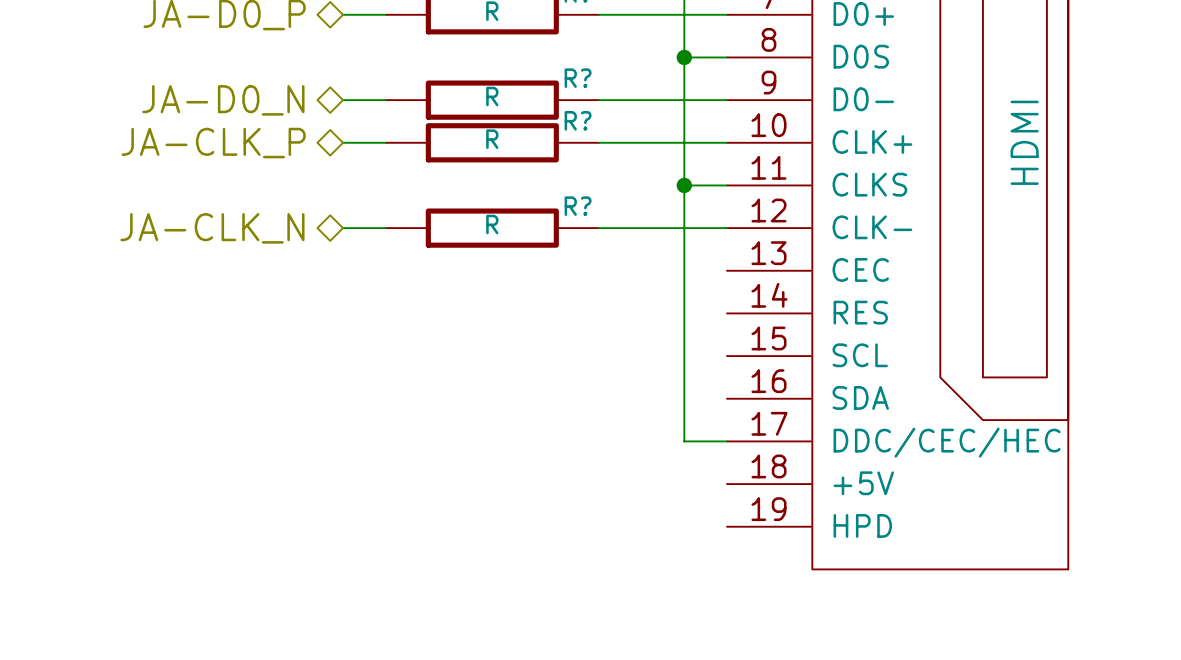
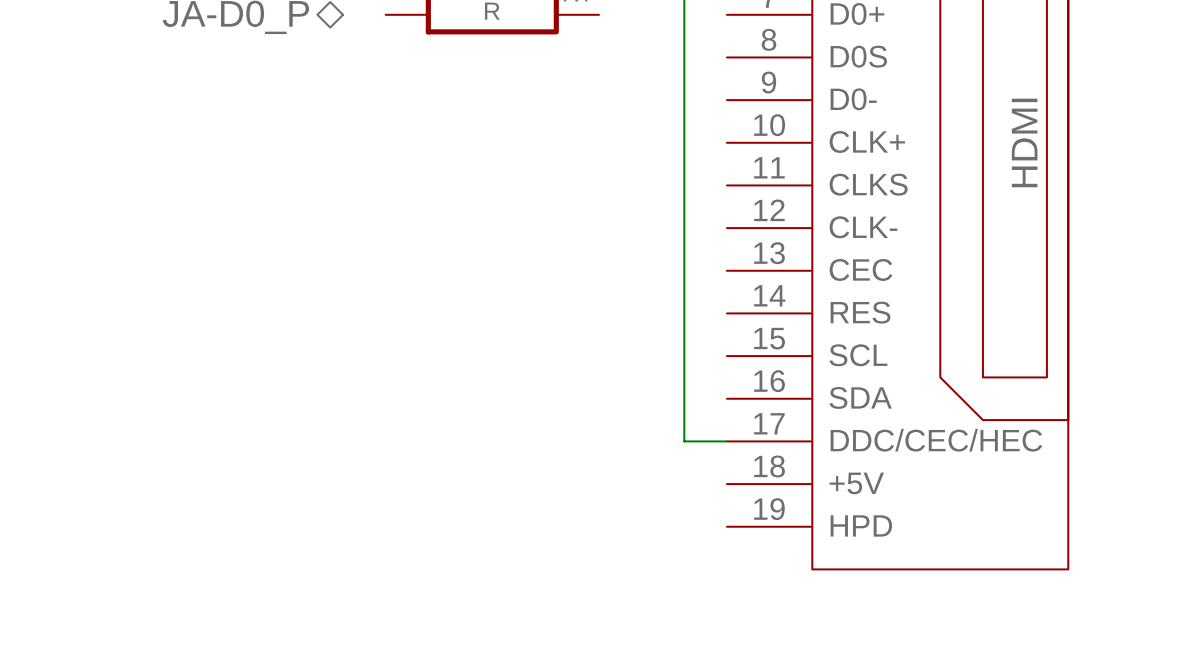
wire: (343, 14) (385, 14) -> none
wire: (598, 14) (726, 14) -> none
wire: (684, 57) (726, 57) -> none
junction: (684, 57) -> none
hierarchical label: JA-D0_N (223, 100) -> none
wire: (343, 100) (385, 100) -> none
R?: R (492, 100) -> none
wire: (598, 100) (726, 100) -> none
wire: (343, 142) (385, 142) -> none
R?: R (492, 142) -> none
wire: (598, 142) (726, 142) -> none
hierarchical label: JA-CLK_P (213, 143) -> none
wire: (684, 185) (726, 185) -> none
junction: (684, 185) -> none
hierarchical label: JA-CLK_N (212, 228) -> none
wire: (343, 228) (385, 228) -> none
R?: R (492, 228) -> none
wire: (598, 228) (726, 228) -> none

